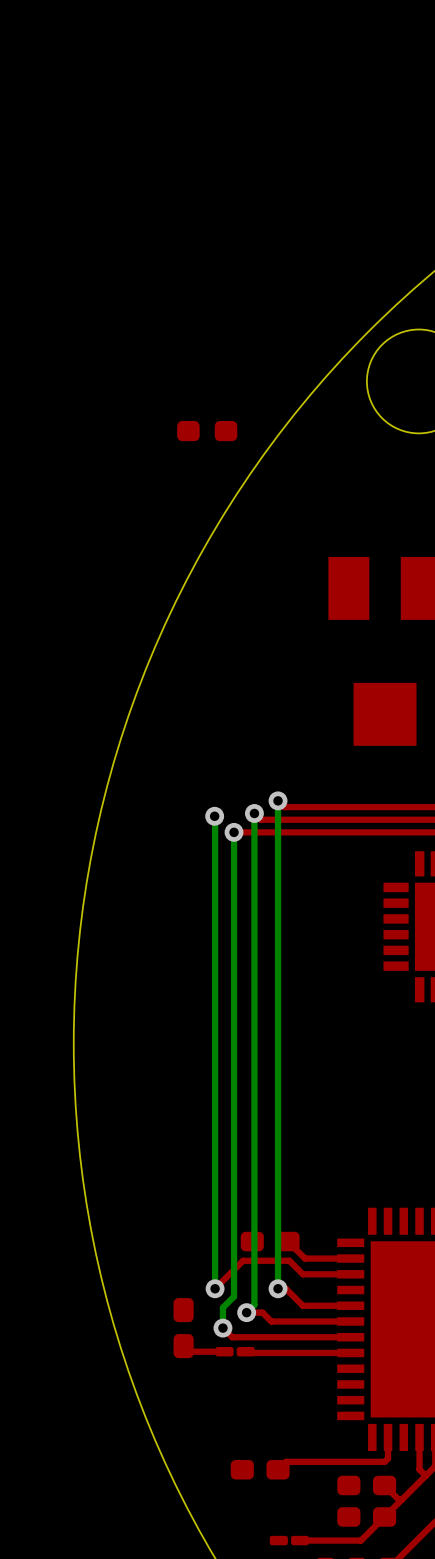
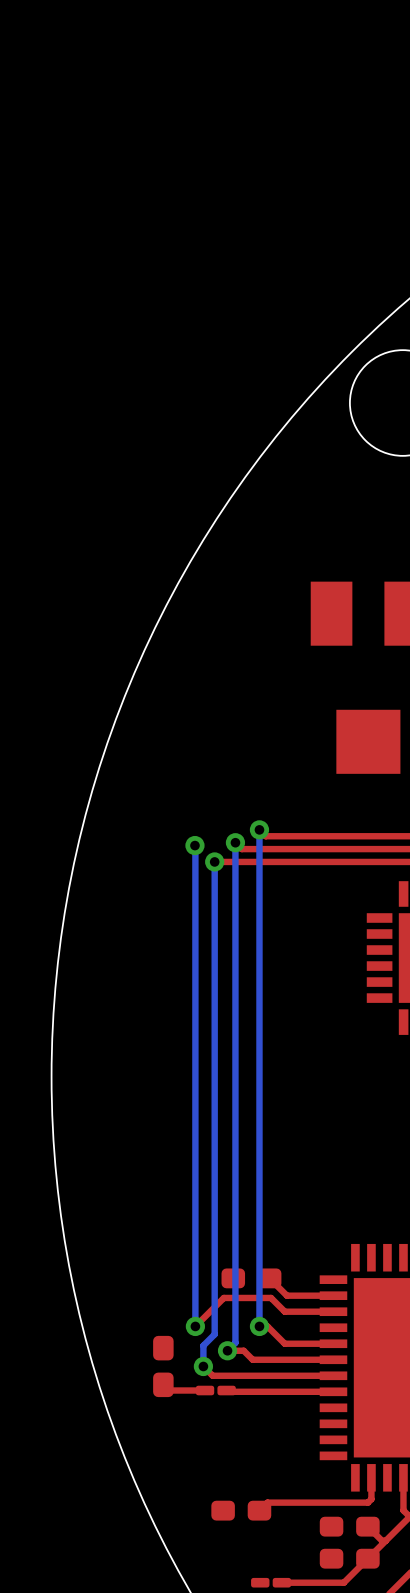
part: (207, 431) -> none

